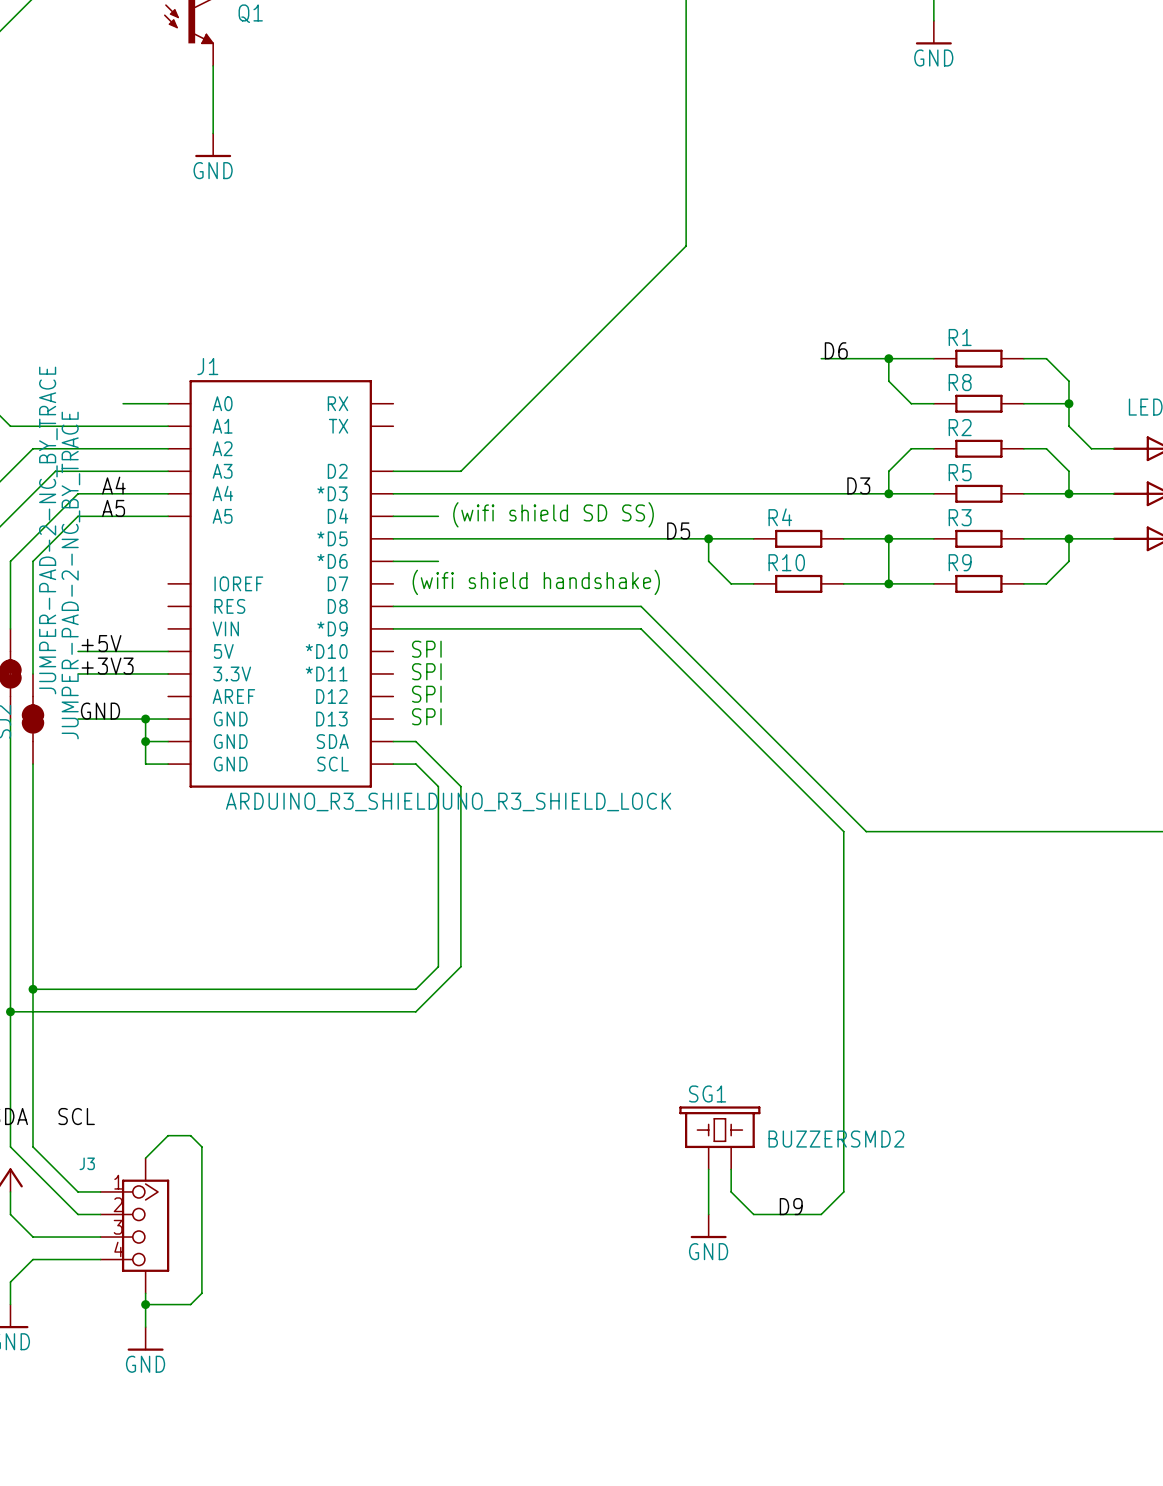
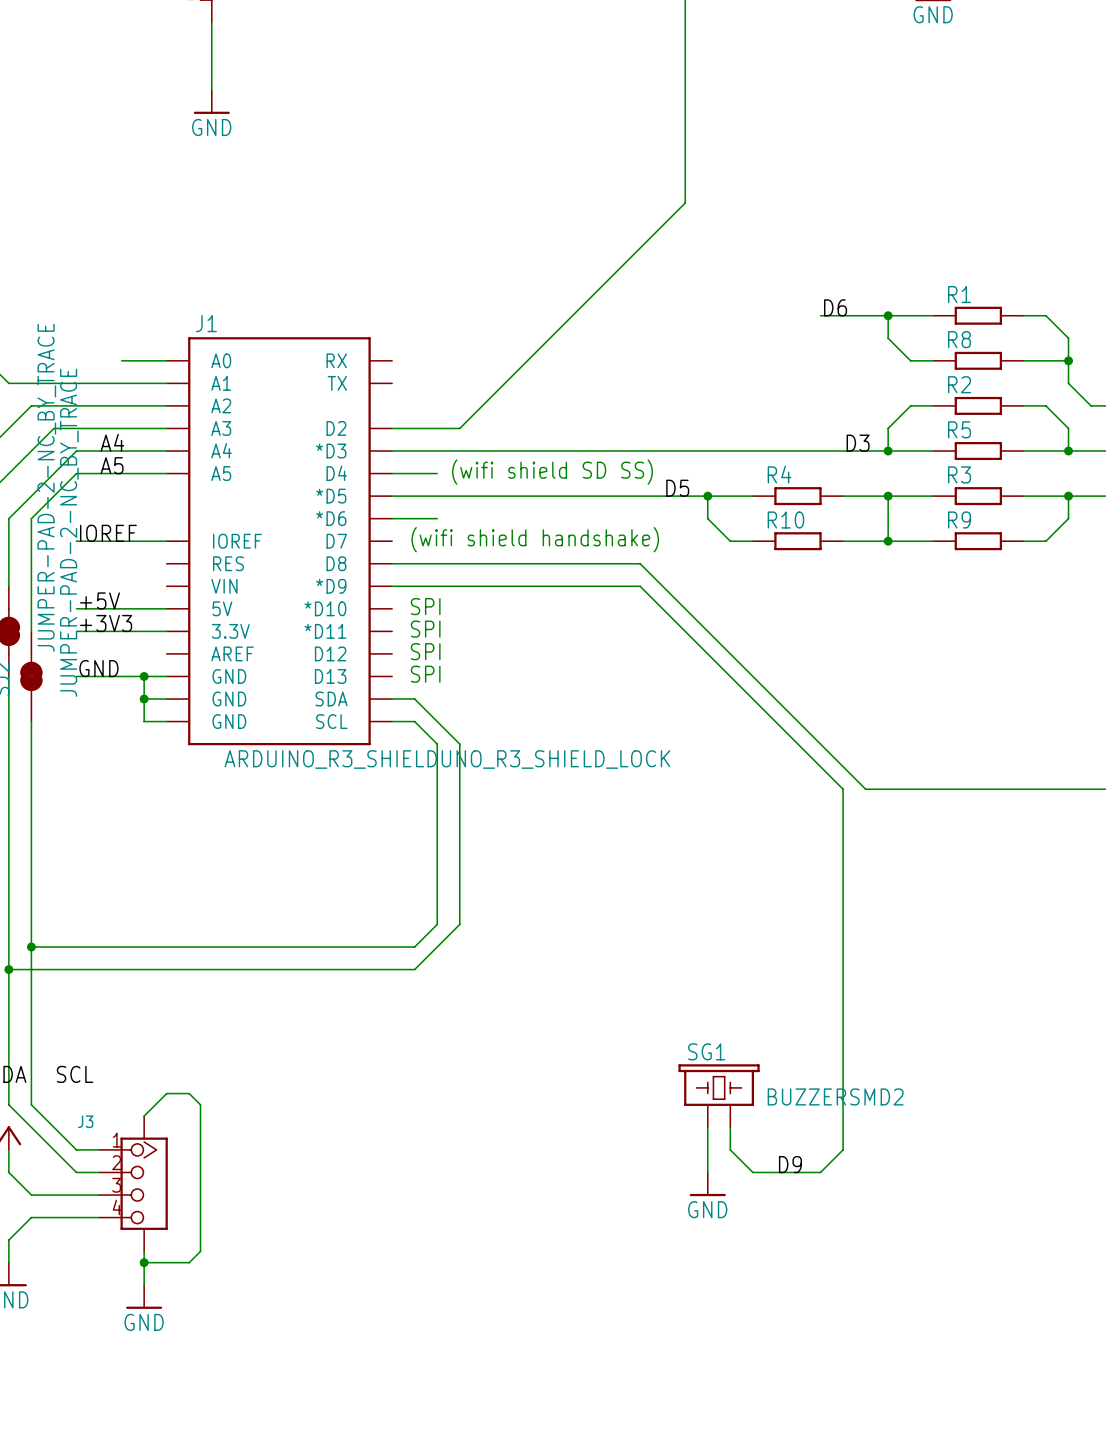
label: none -> IOREF (108, 533)
wire: none -> (76, 541) (166, 541)

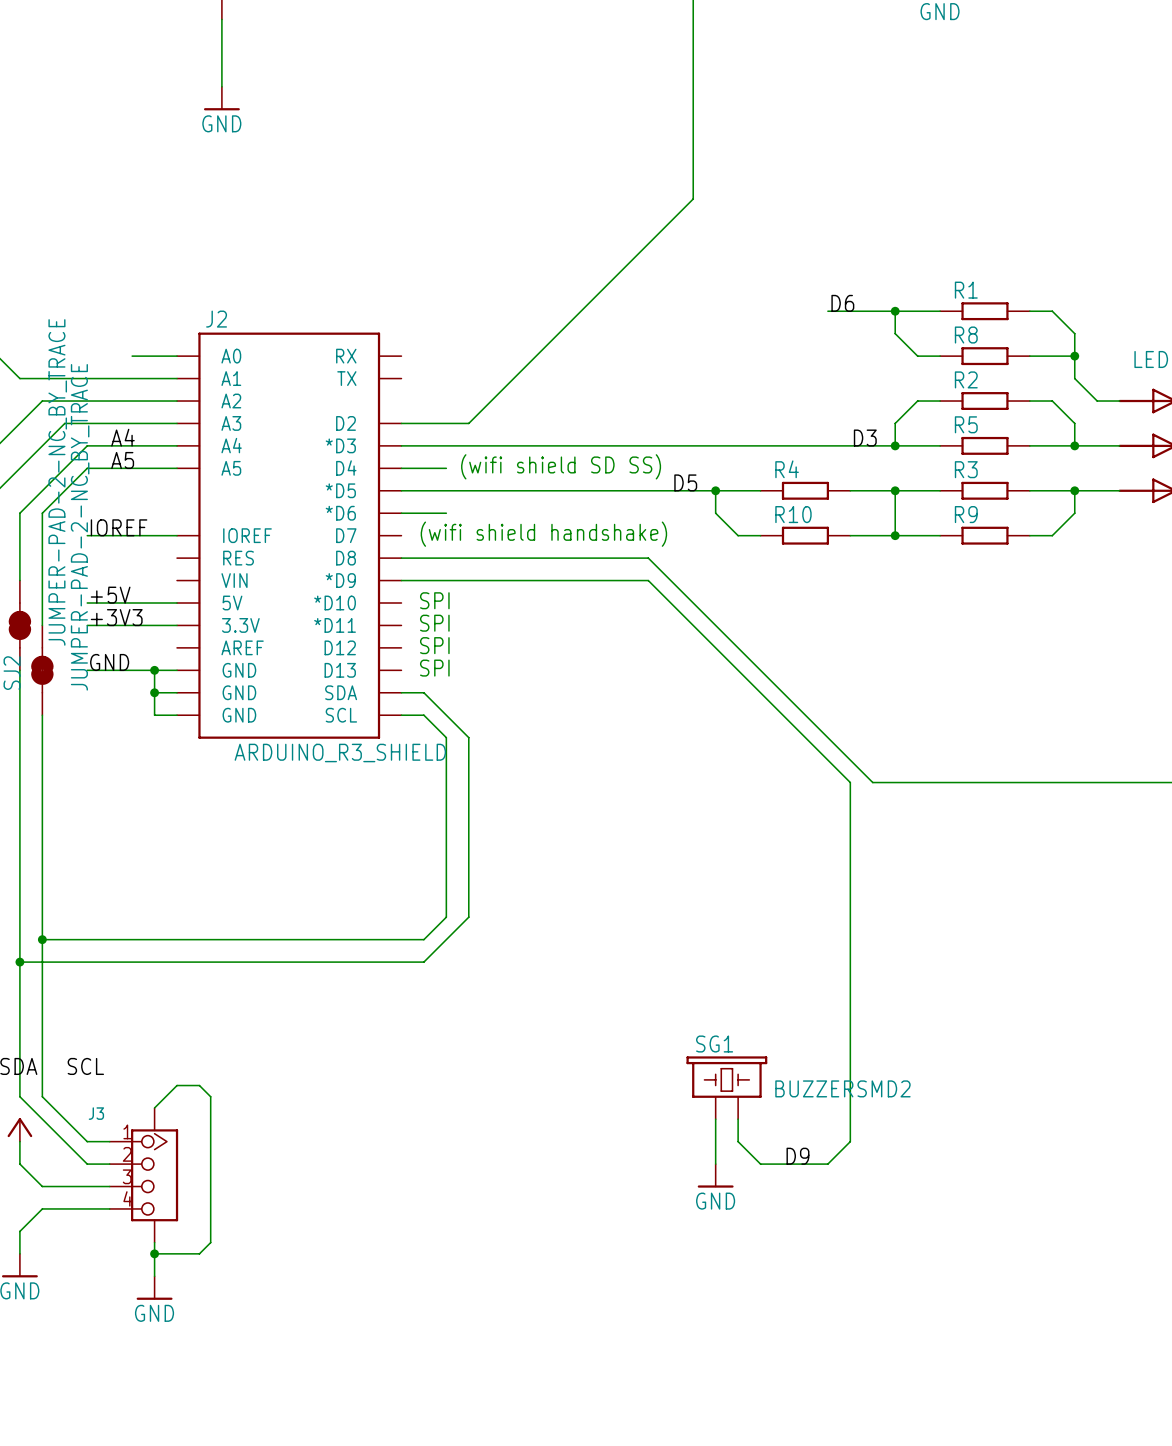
J1 name: J1 (206, 323) -> J2 (216, 319)
J1 value: ARDUINO_R3_SHIELDUNO_R3_SHIELD_LOCK (447, 759) -> ARDUINO_R3_SHIELD (340, 752)

